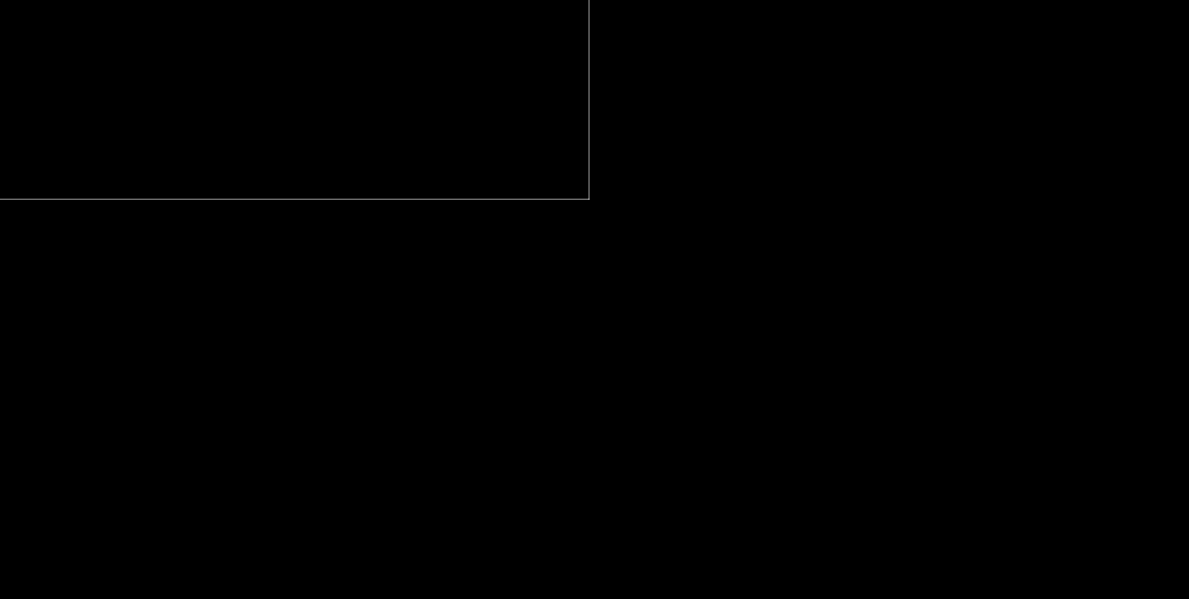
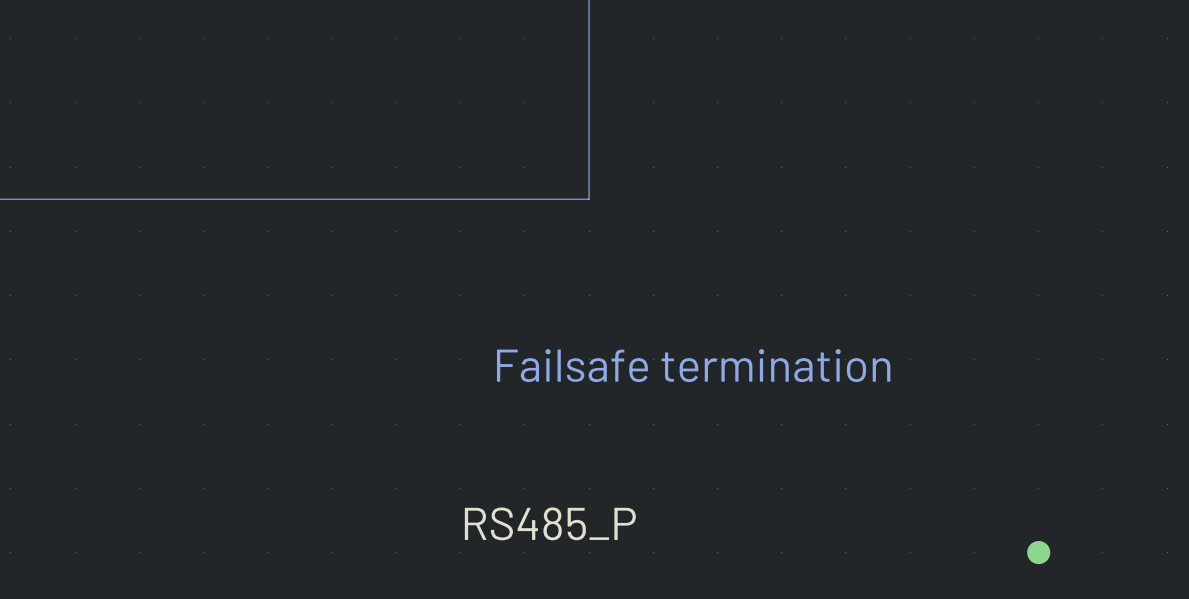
text: none -> Failsafe termination (693, 365)
label: none -> RS485_P (550, 523)
junction: none -> (1038, 552)

